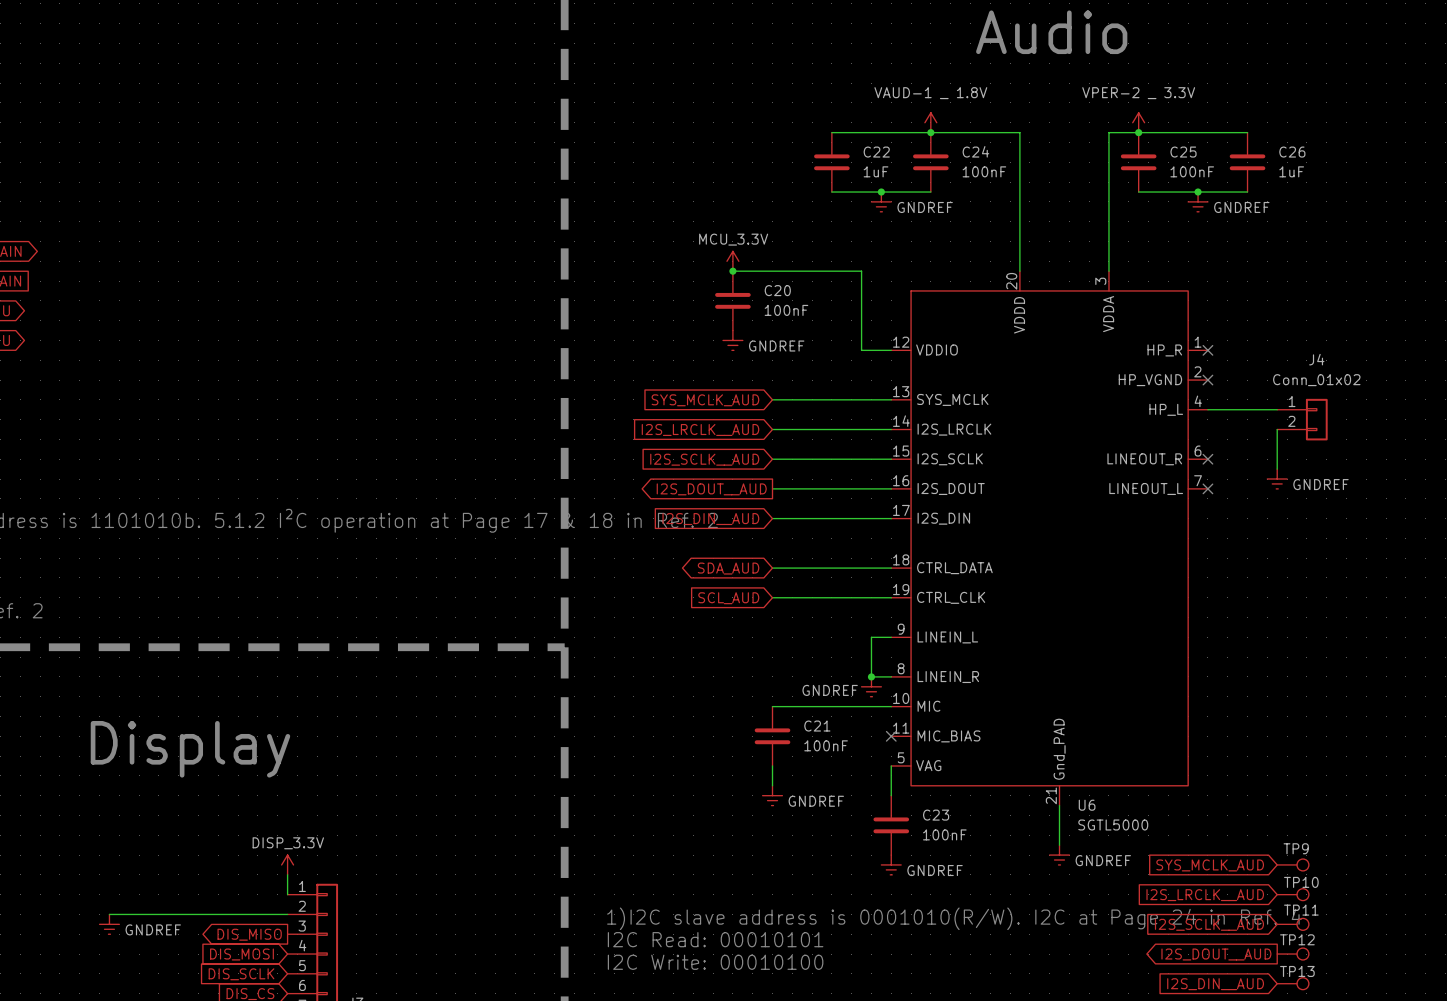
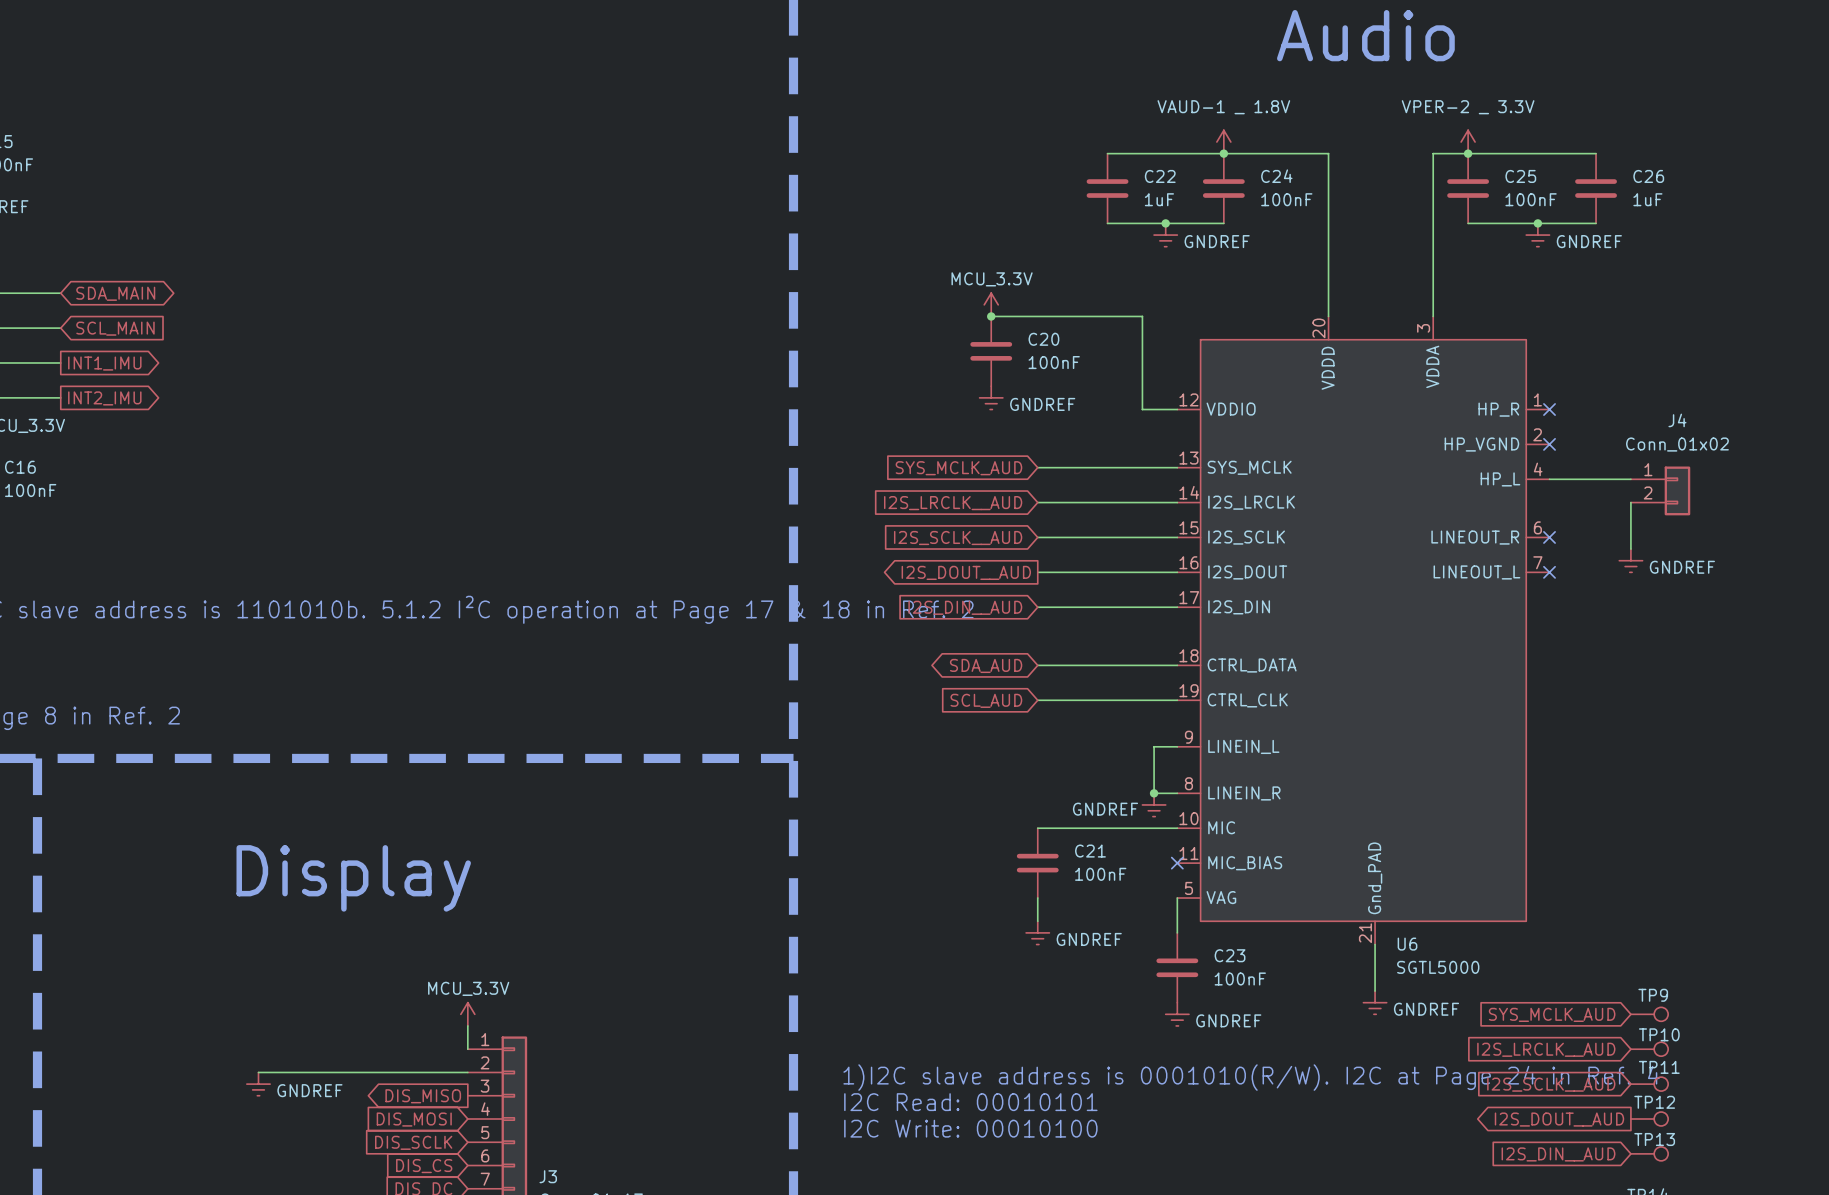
power symbol: DISP_3.3V (287, 864) -> MCU_3.3V (467, 1014)

